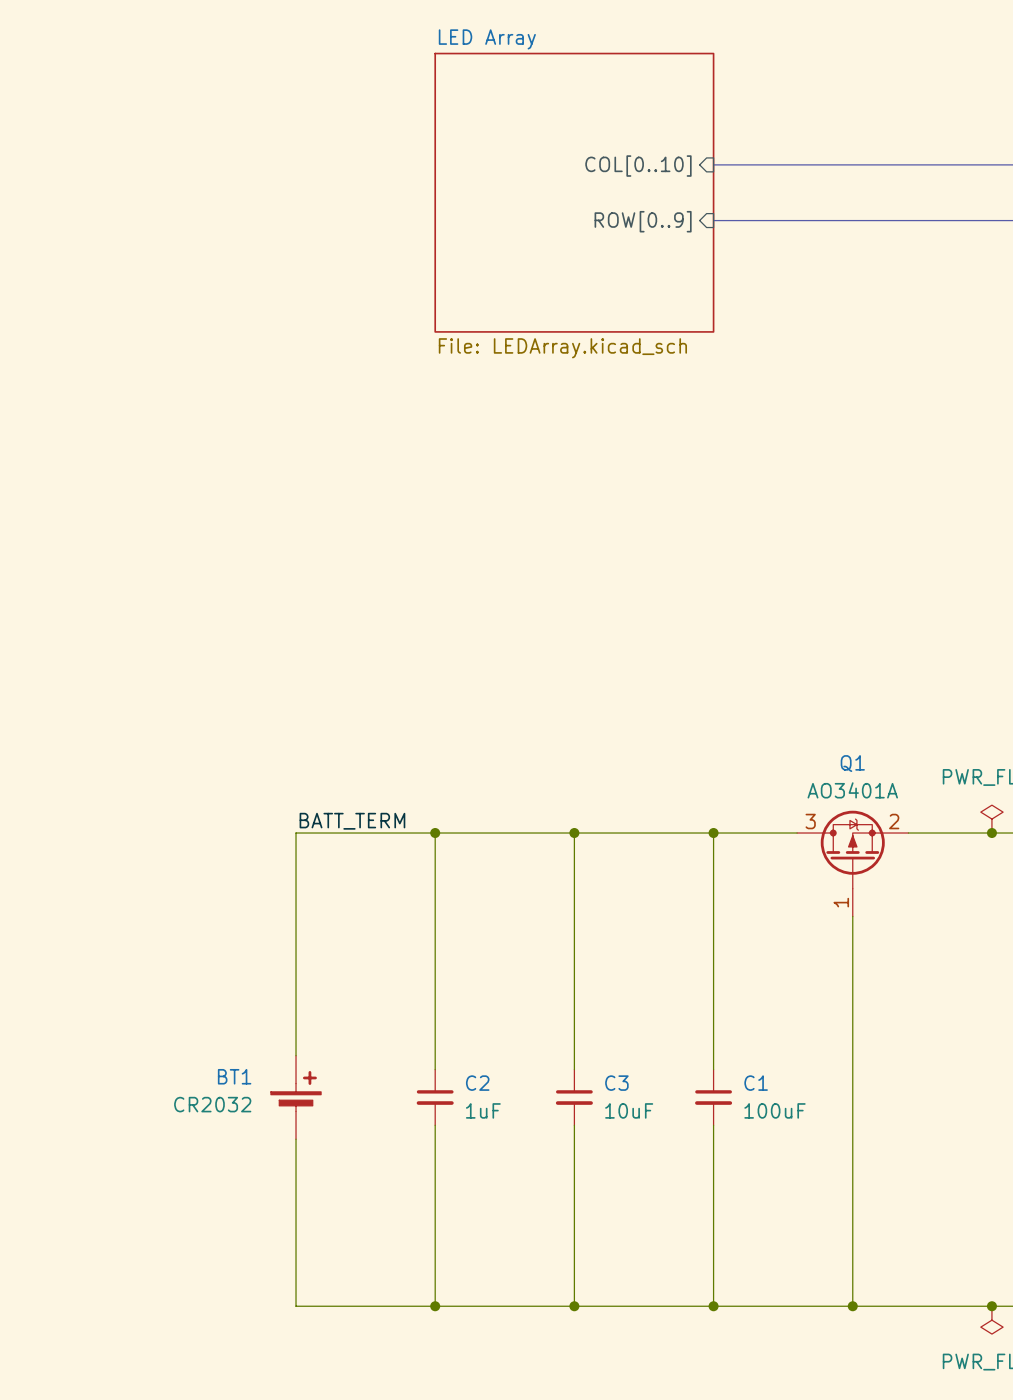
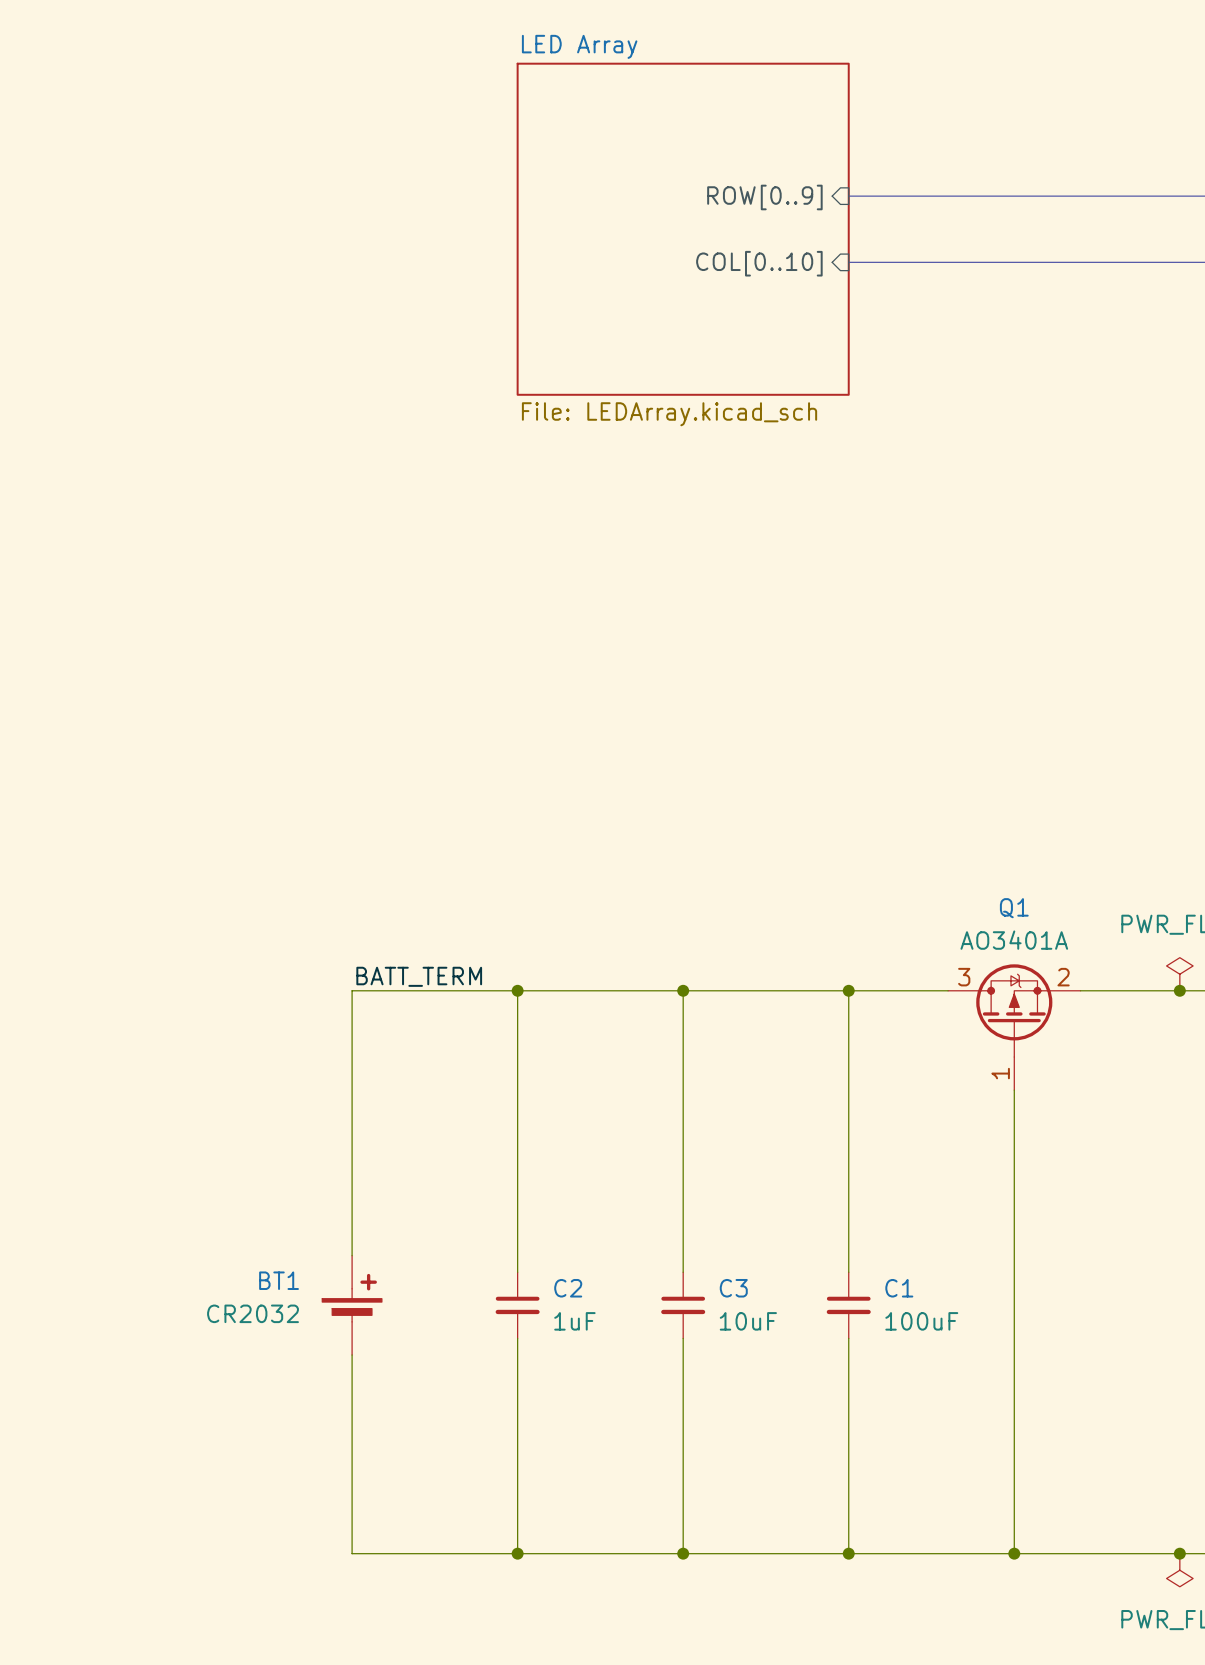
sheet pin: COL[0..10] (638, 166) -> ROW[0..9] (764, 197)
sheet pin: ROW[0..9] (643, 221) -> COL[0..10] (759, 263)

